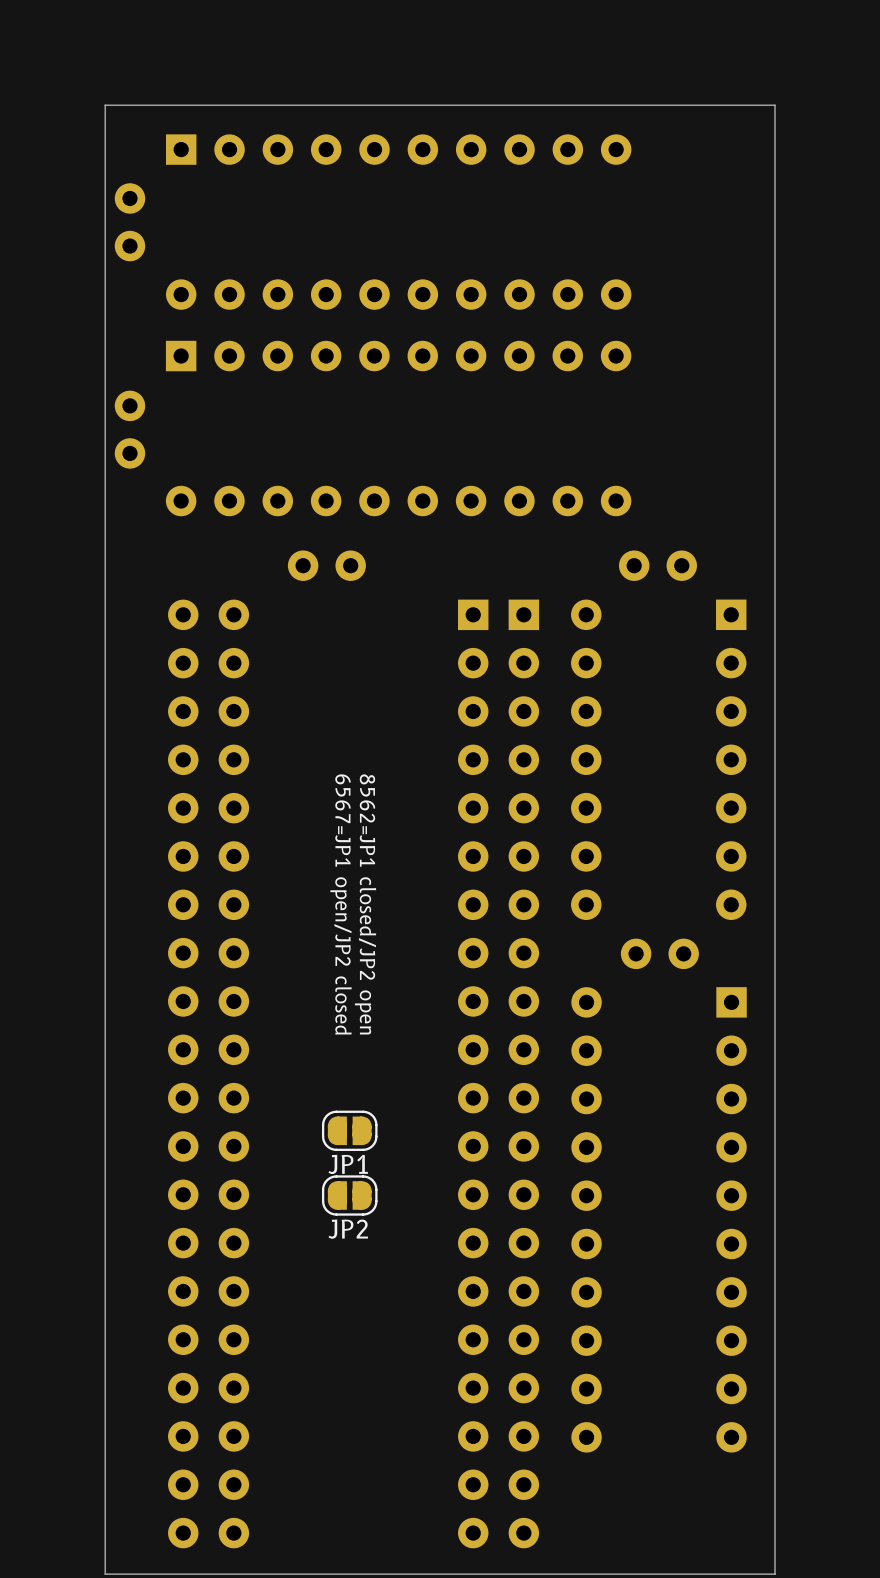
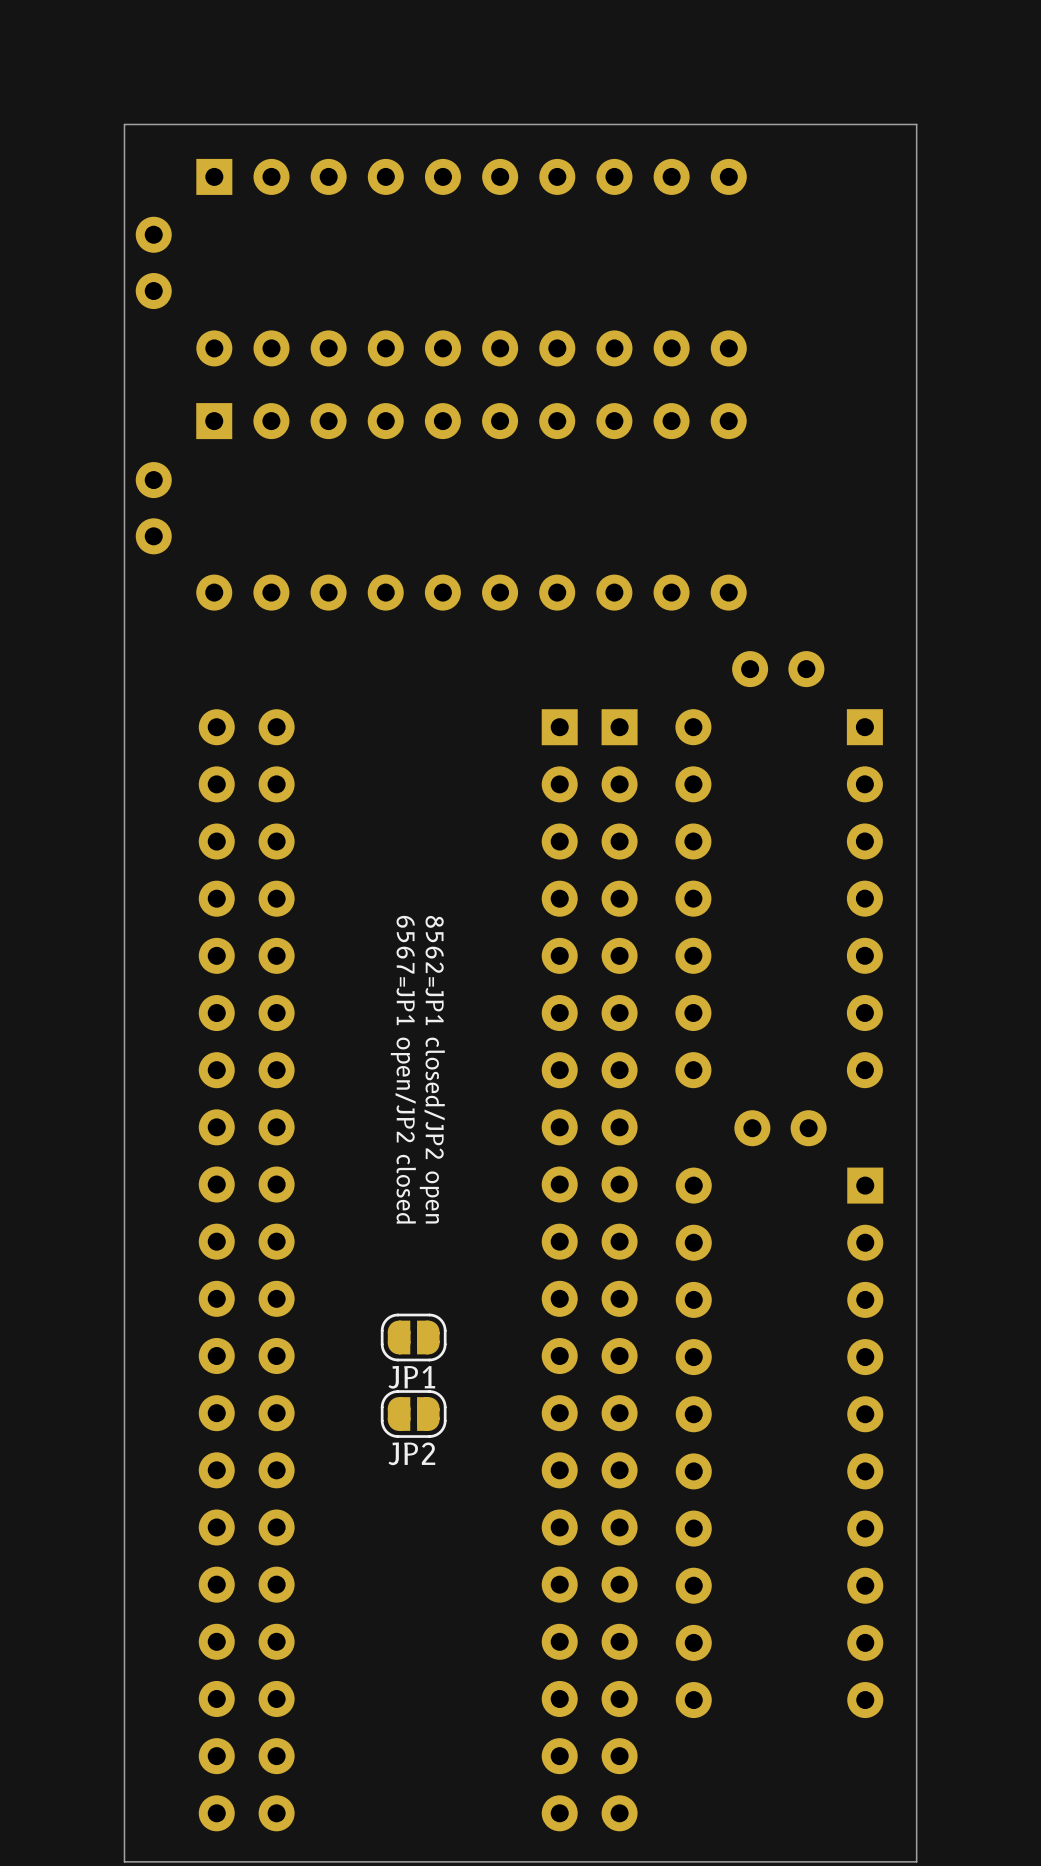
part: (326, 565) -> none

